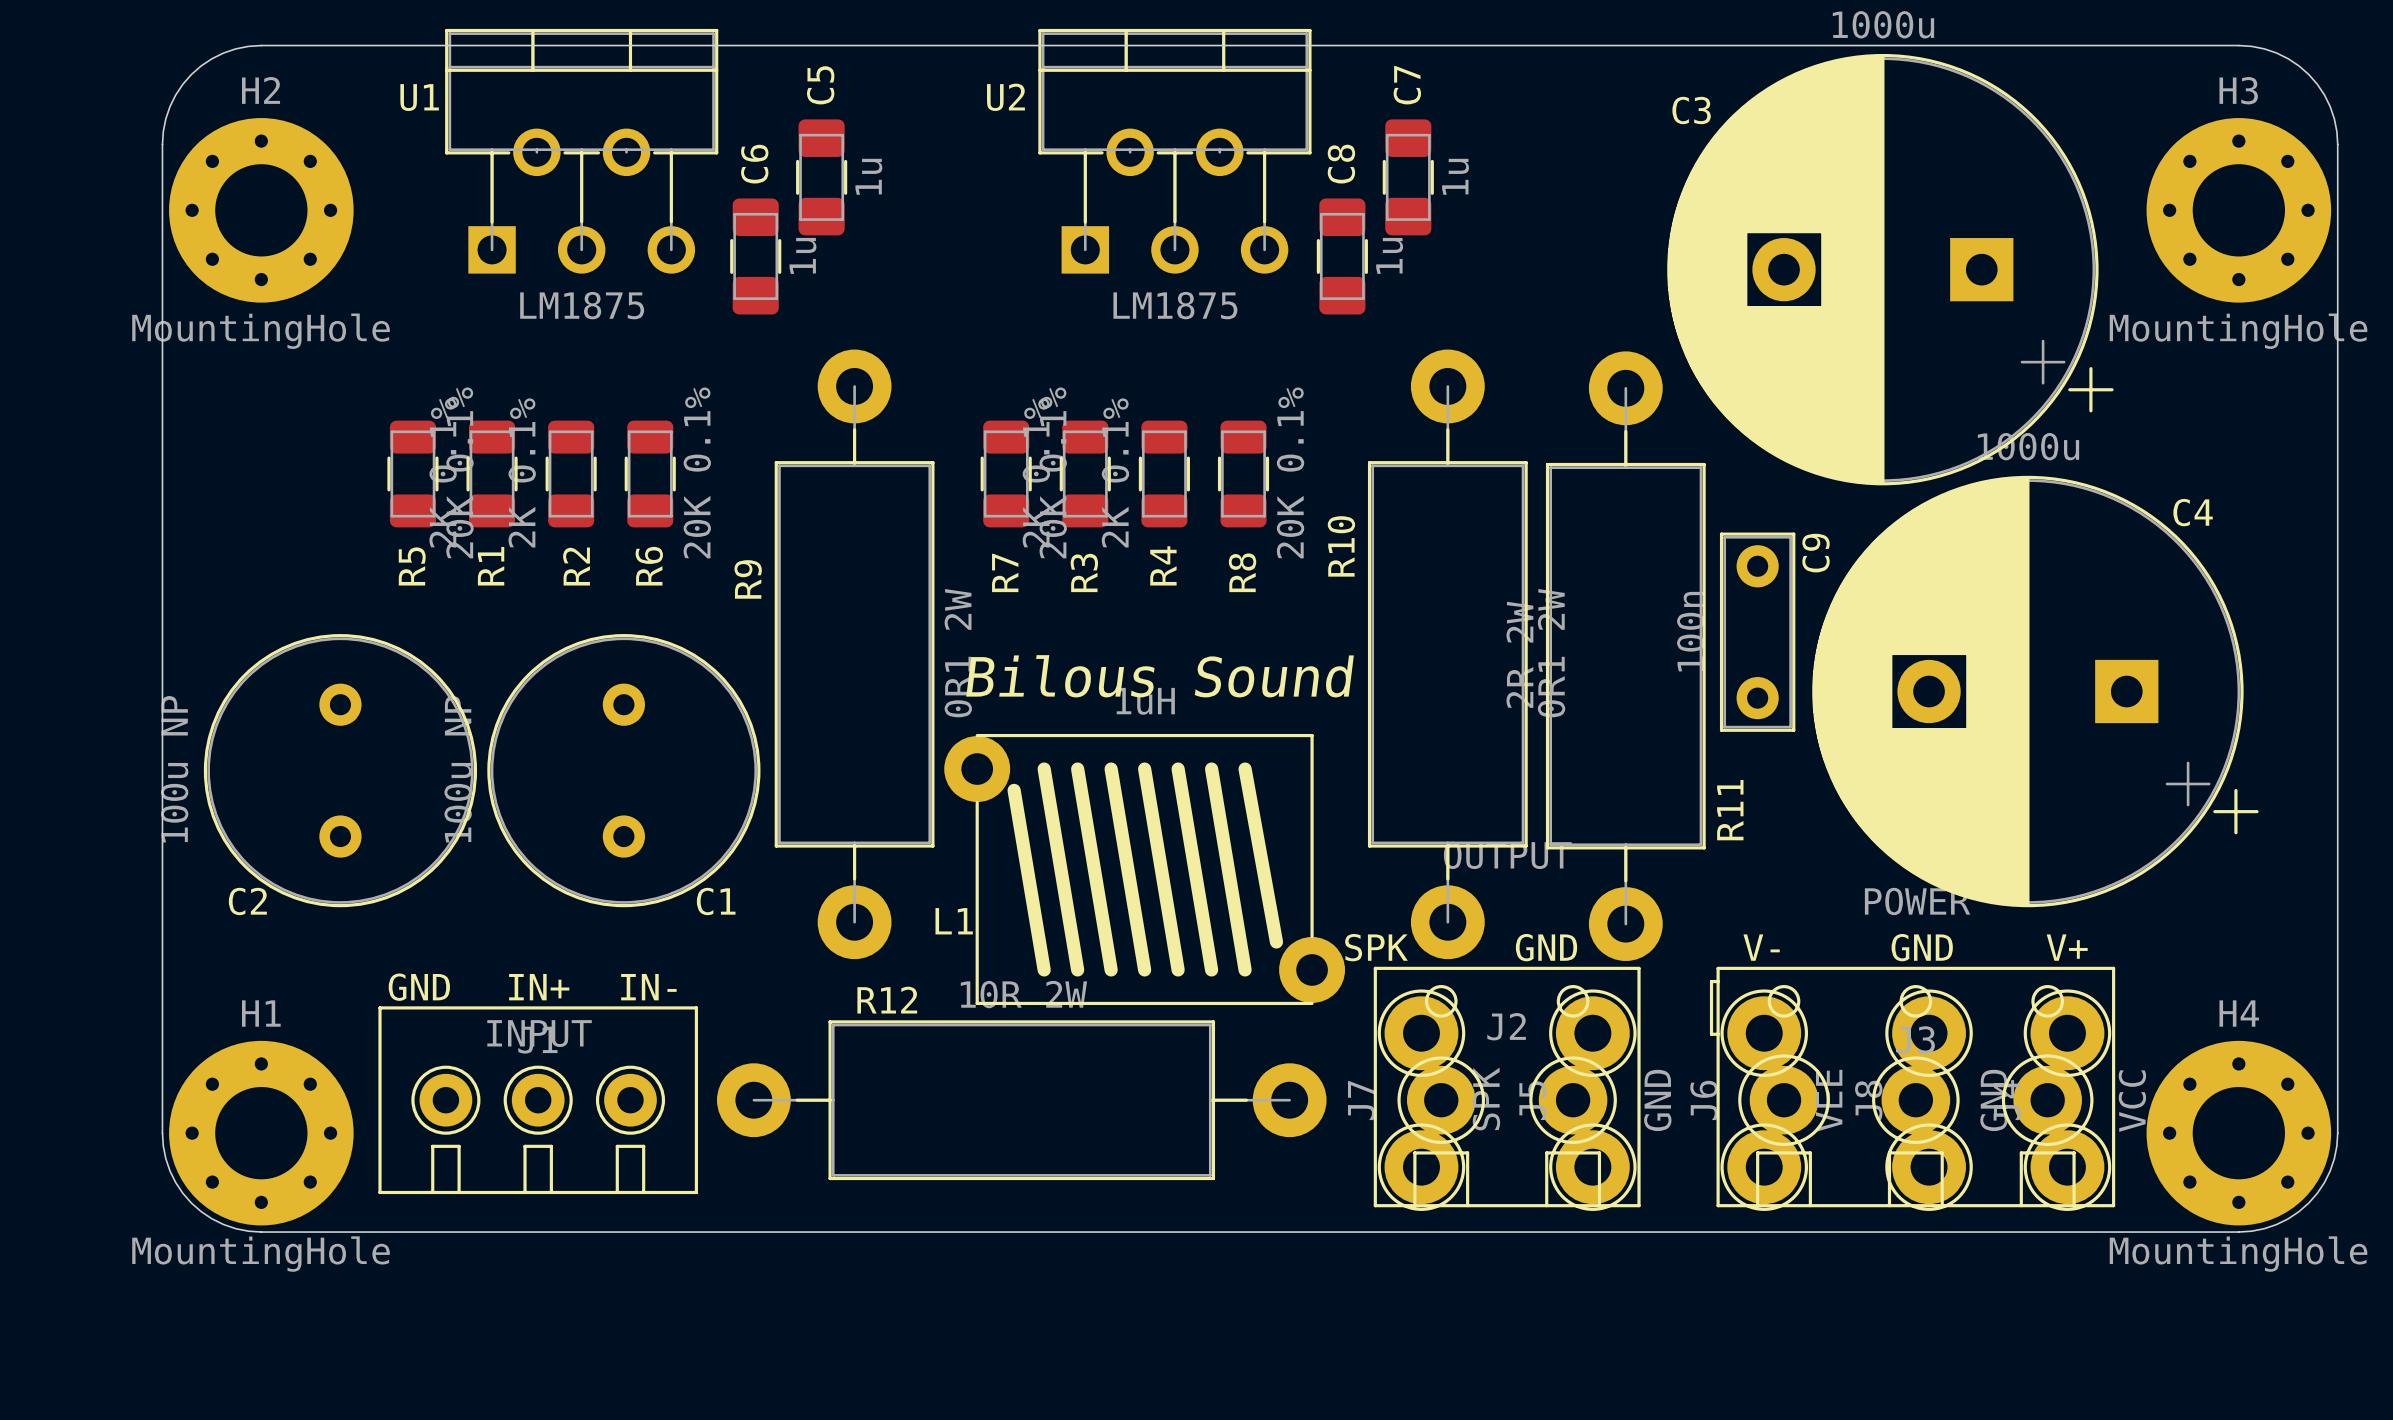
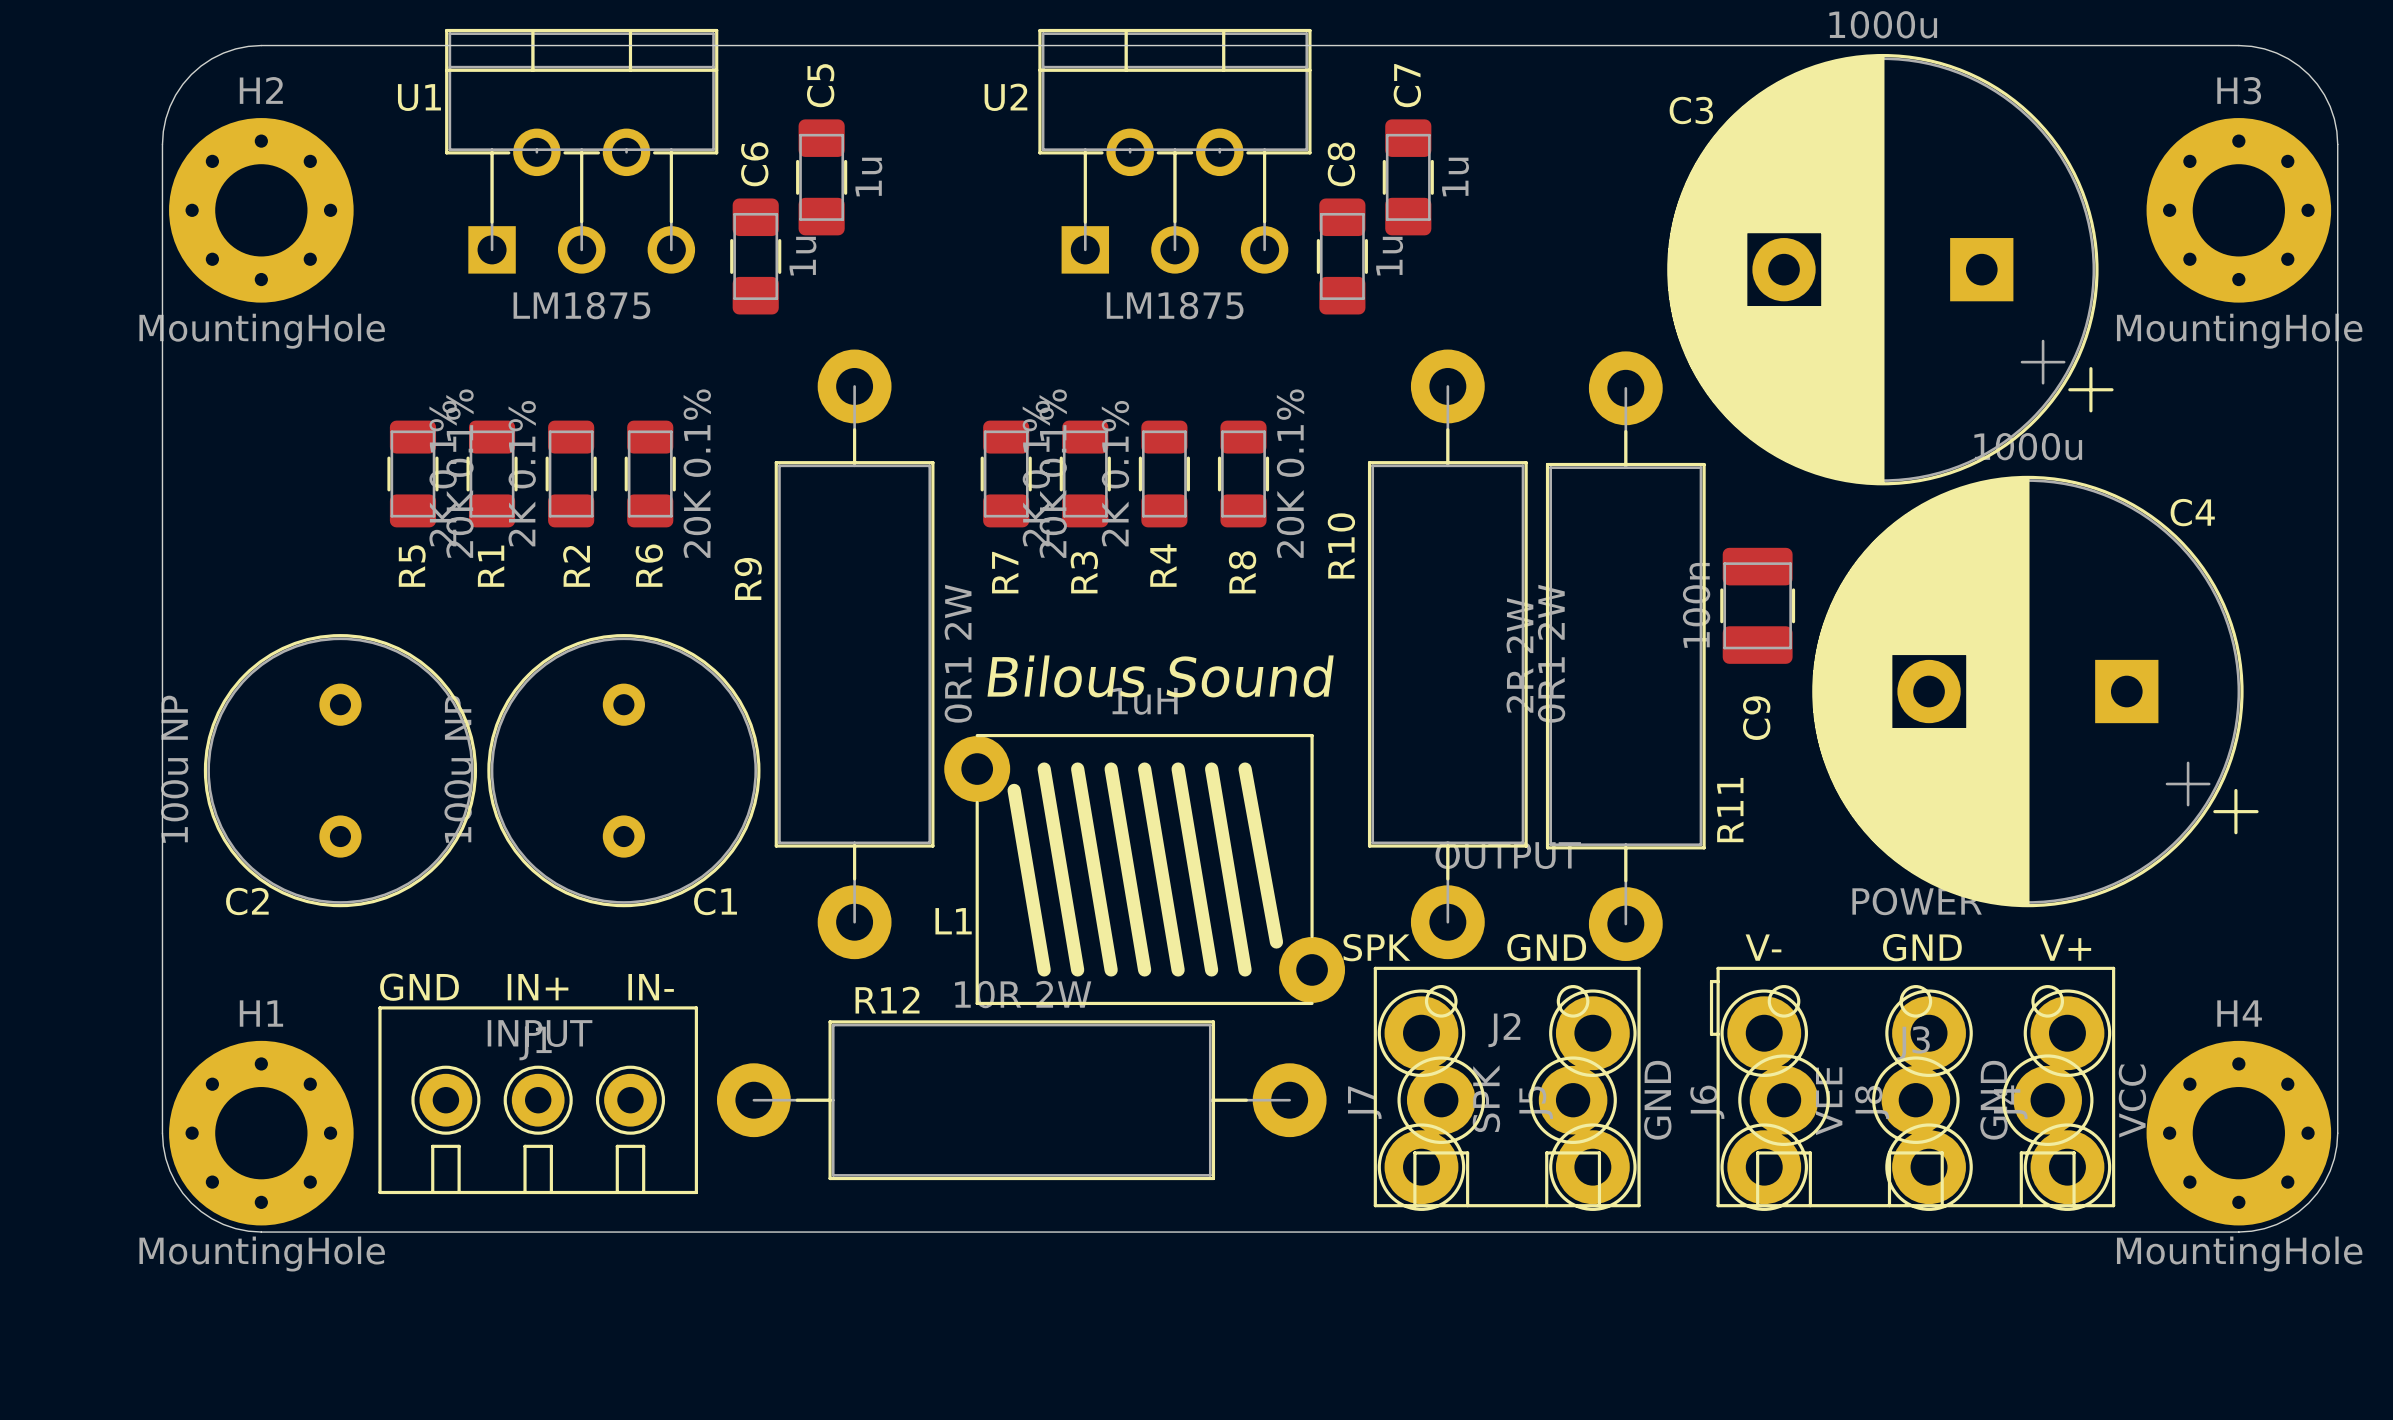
C9 footprint: [1719, 532, 1796, 732] -> [1720, 547, 1796, 664]
C9 name position: C9 (1816, 553) -> C9 (1756, 718)

